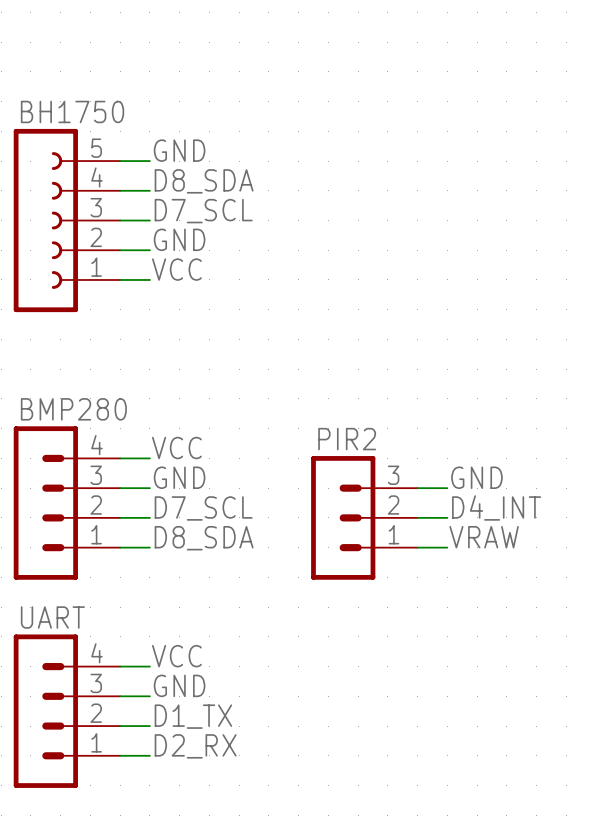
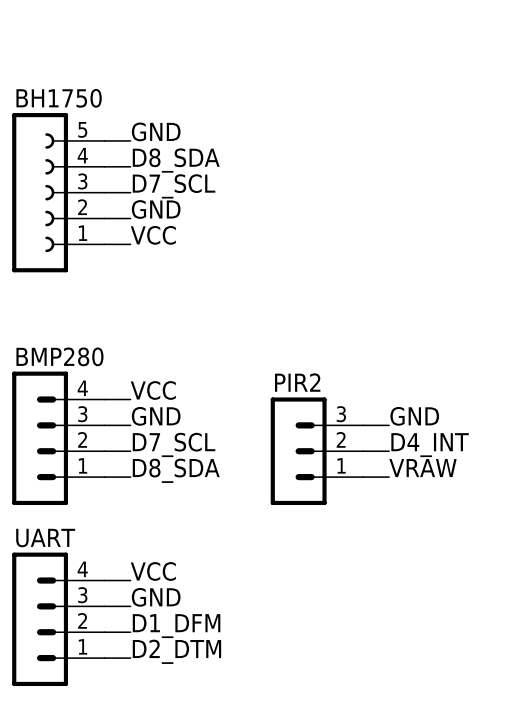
label: D1_TX (193, 716) -> D1_DFM (176, 626)
label: D2_RX (195, 746) -> D2_DTM (176, 651)

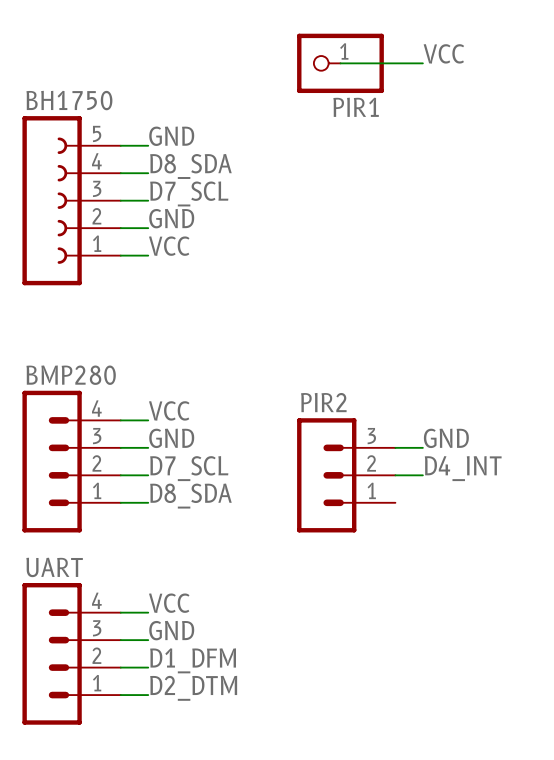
label: none -> VCC (443, 53)
wire: none -> (340, 63) (422, 63)
PIR1: none -> (340, 63)
label: VRAW (422, 468) -> none
wire: (363, 477) (389, 477) -> none

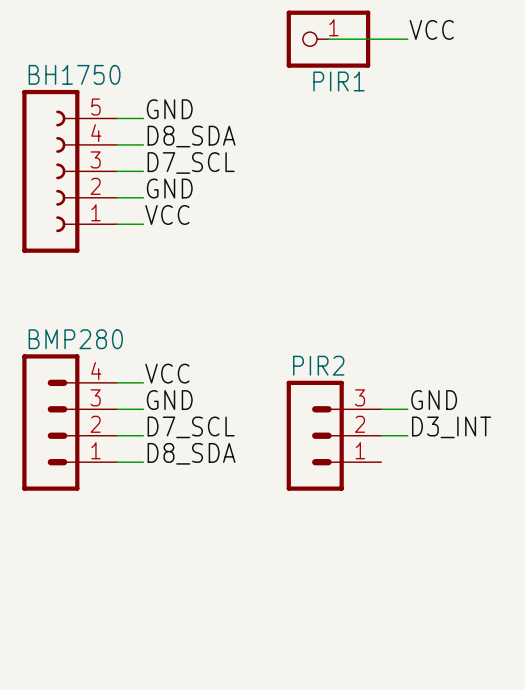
label: D4_INT (463, 468) -> D3_INT (451, 427)
label: VCC (169, 603) -> none
wire: (120, 612) (148, 612) -> none
label: GND (171, 630) -> none
wire: (120, 640) (148, 640) -> none
UART: (71, 653) -> none
label: D1_DFM (193, 660) -> none
wire: (120, 667) (148, 667) -> none
label: D2_DTM (193, 688) -> none
wire: (120, 695) (148, 695) -> none

